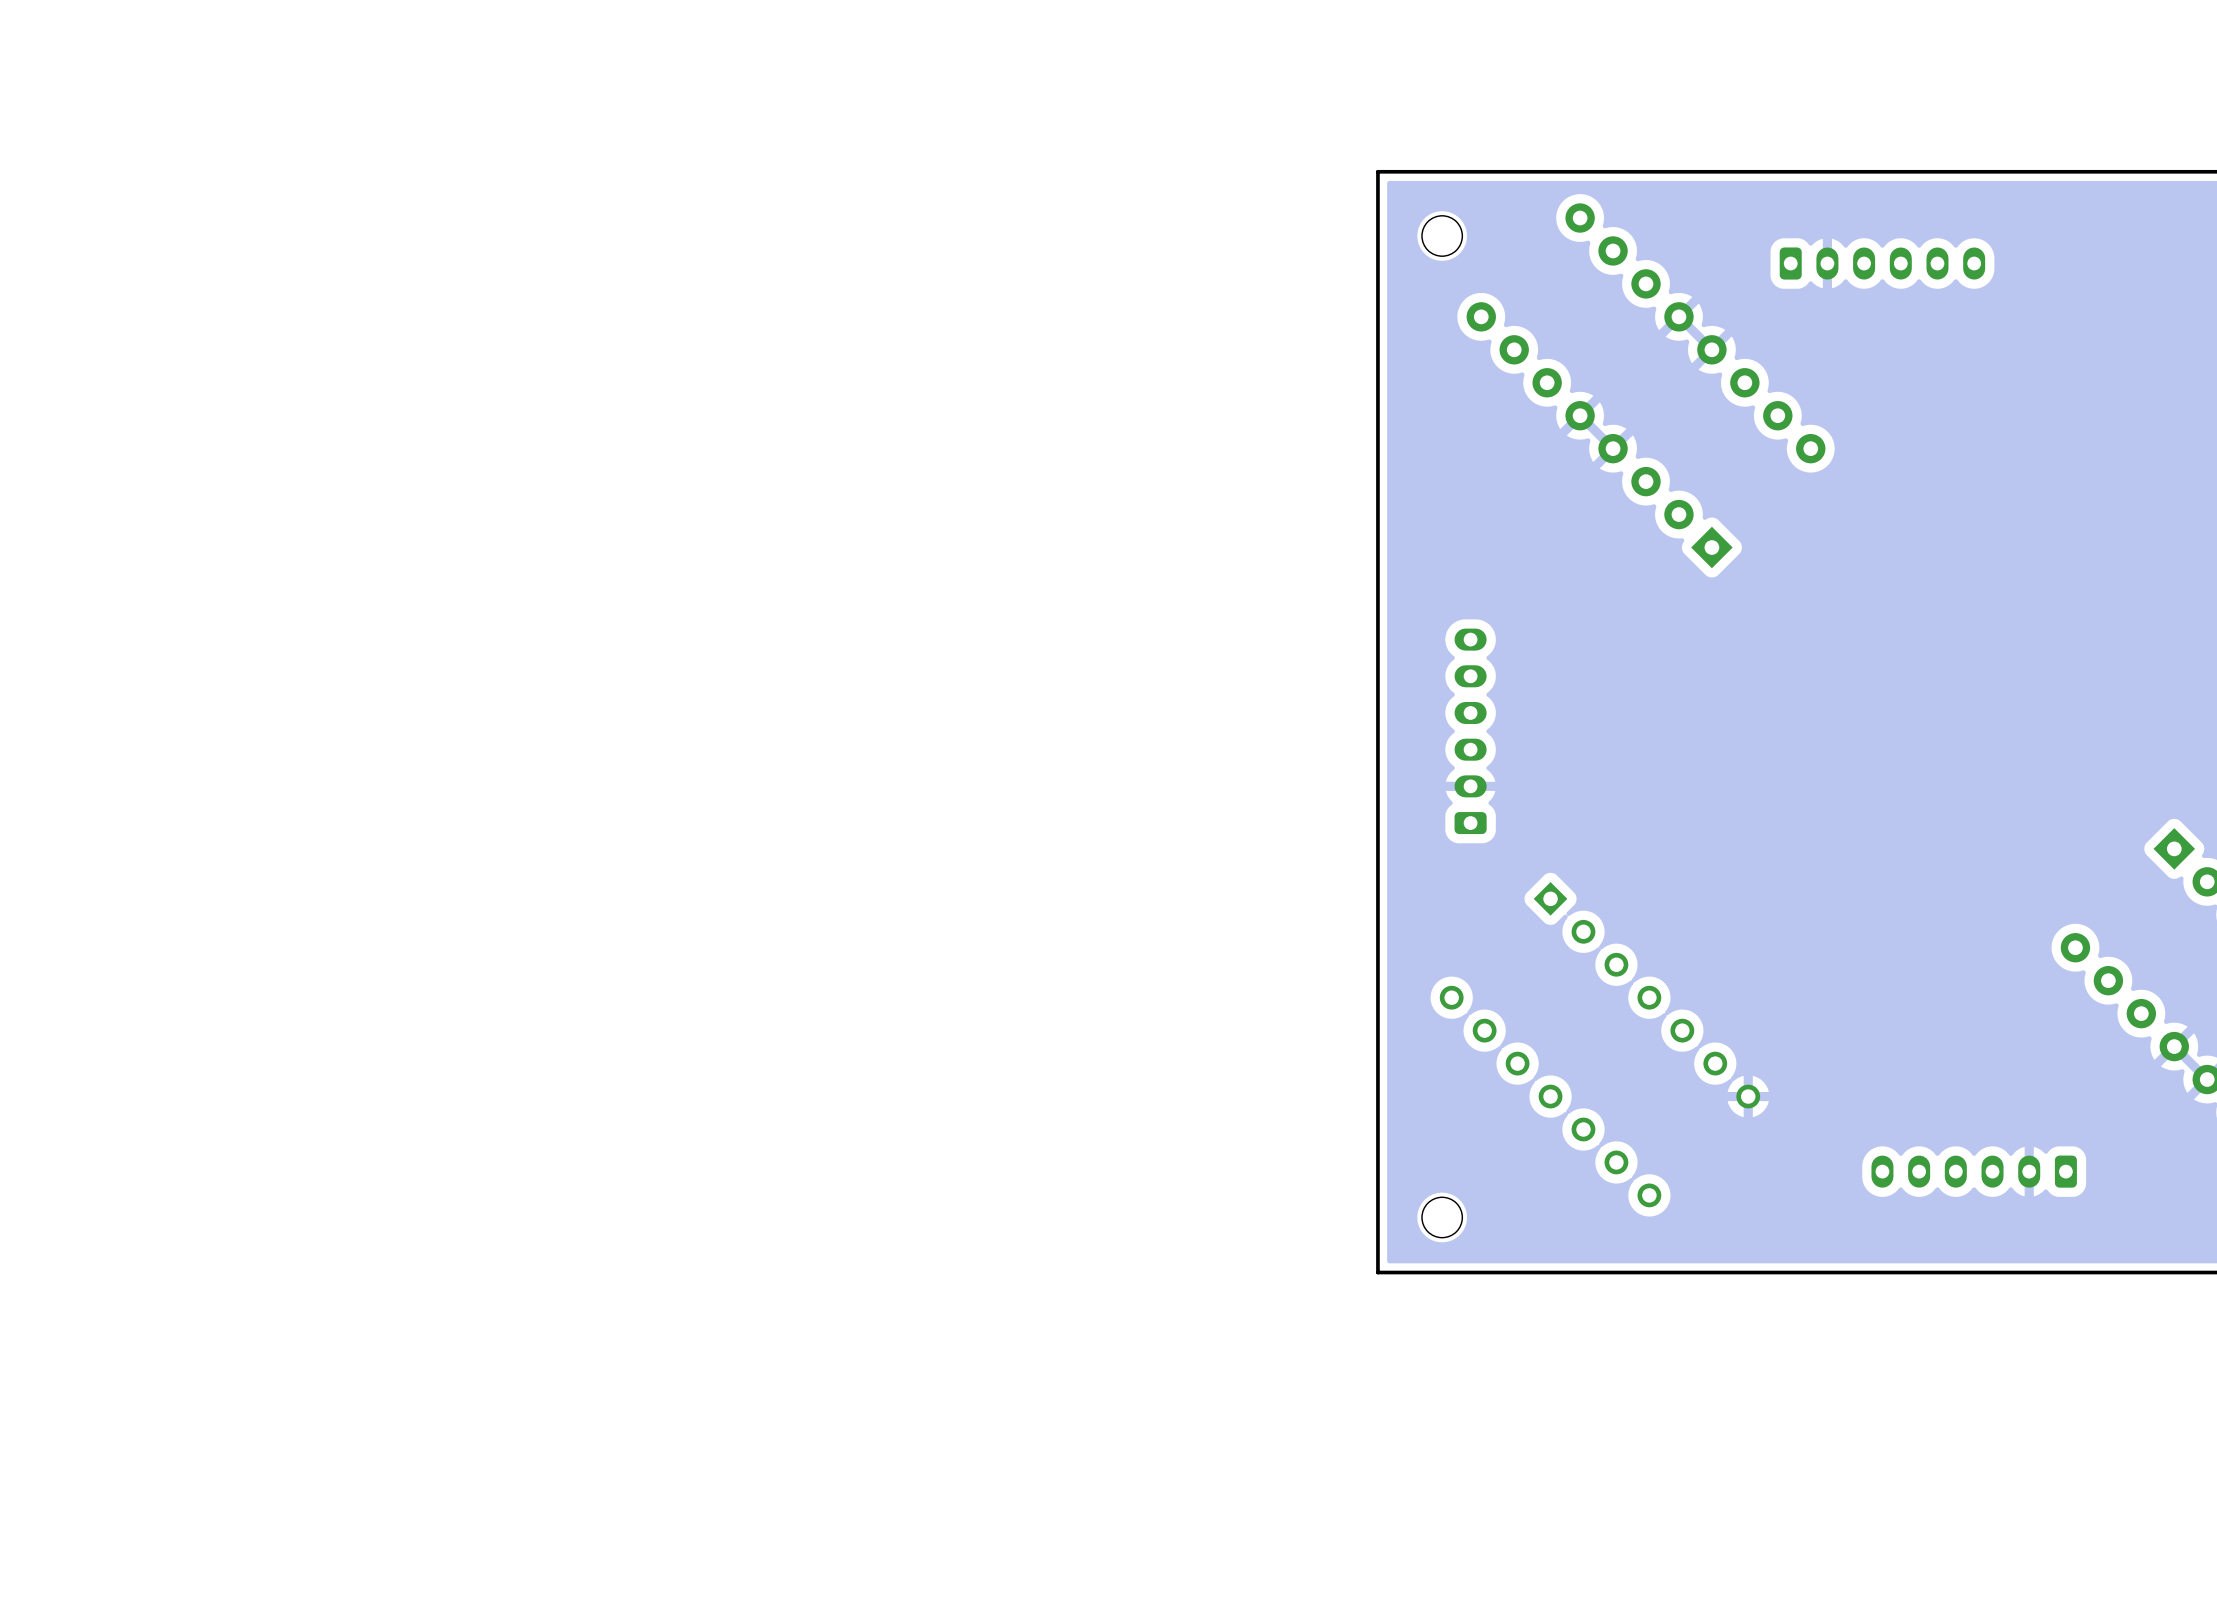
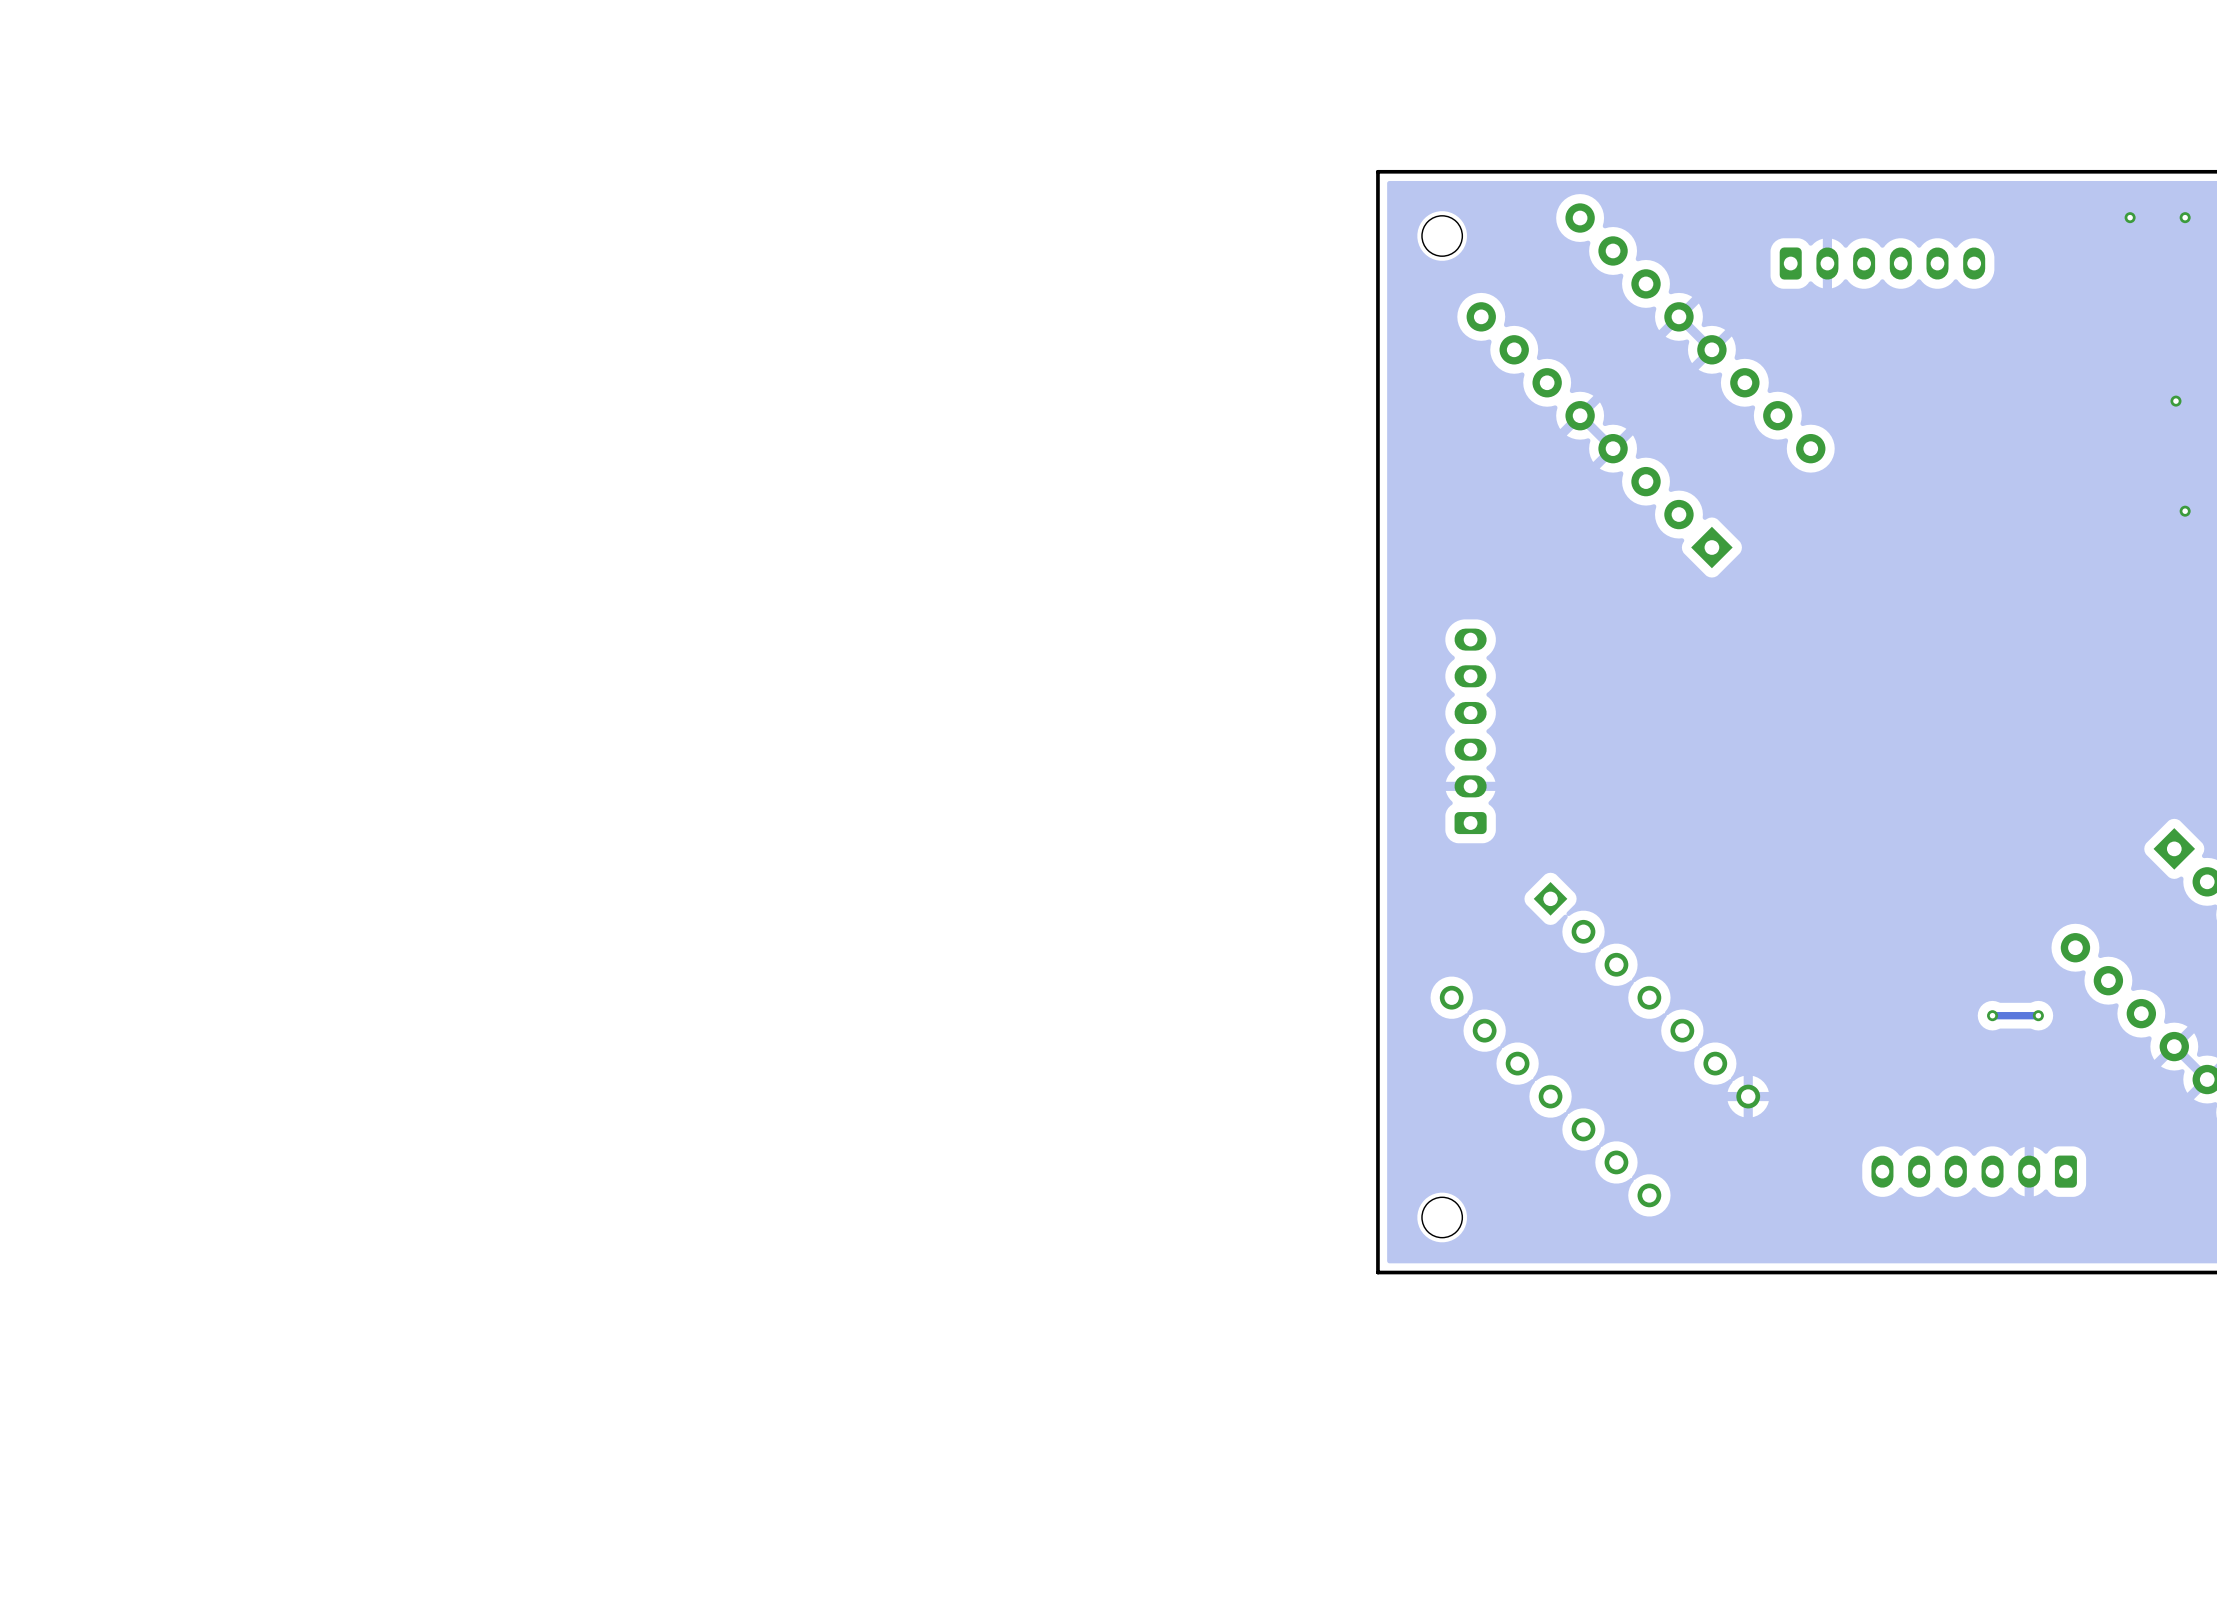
via: none -> (2130, 217)
via: none -> (2185, 217)
via: none -> (2175, 401)
via: none -> (2185, 511)
via: none -> (1992, 1015)
track: none -> (2038, 1015) (1992, 1015)
via: none -> (2038, 1015)

